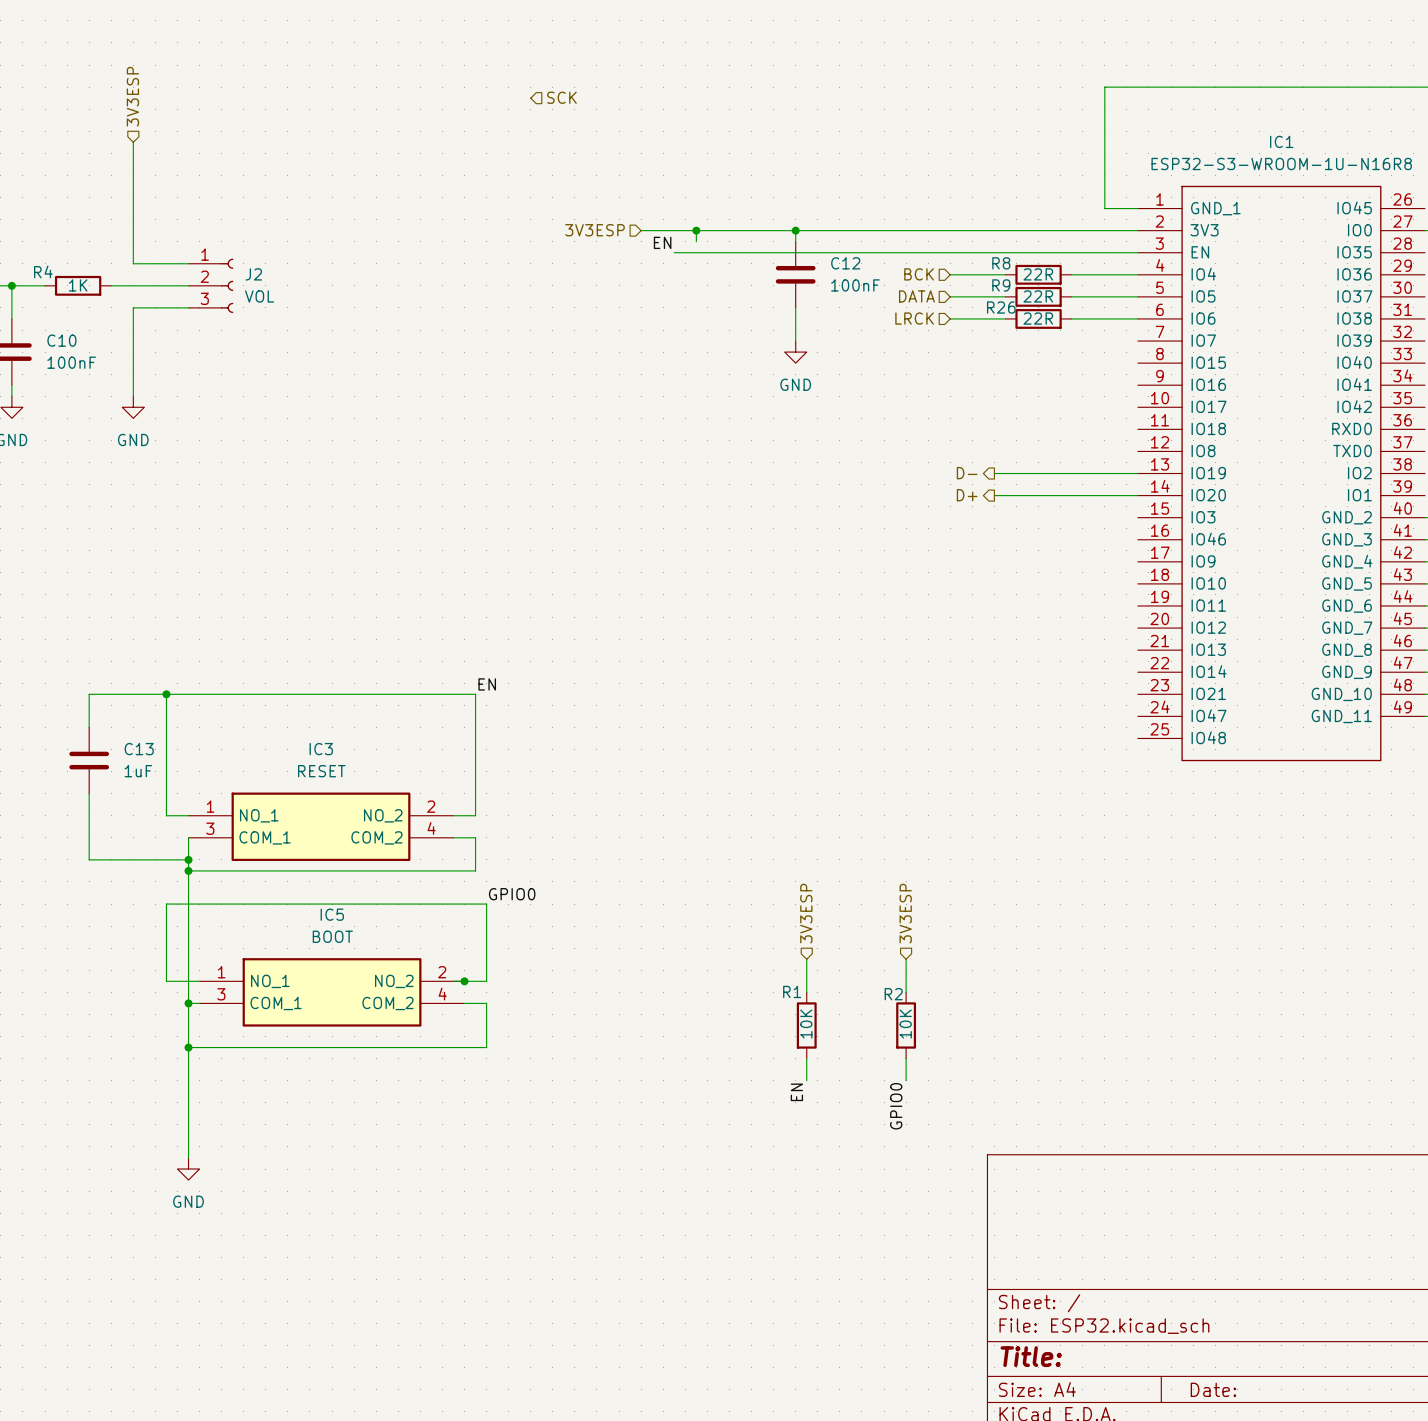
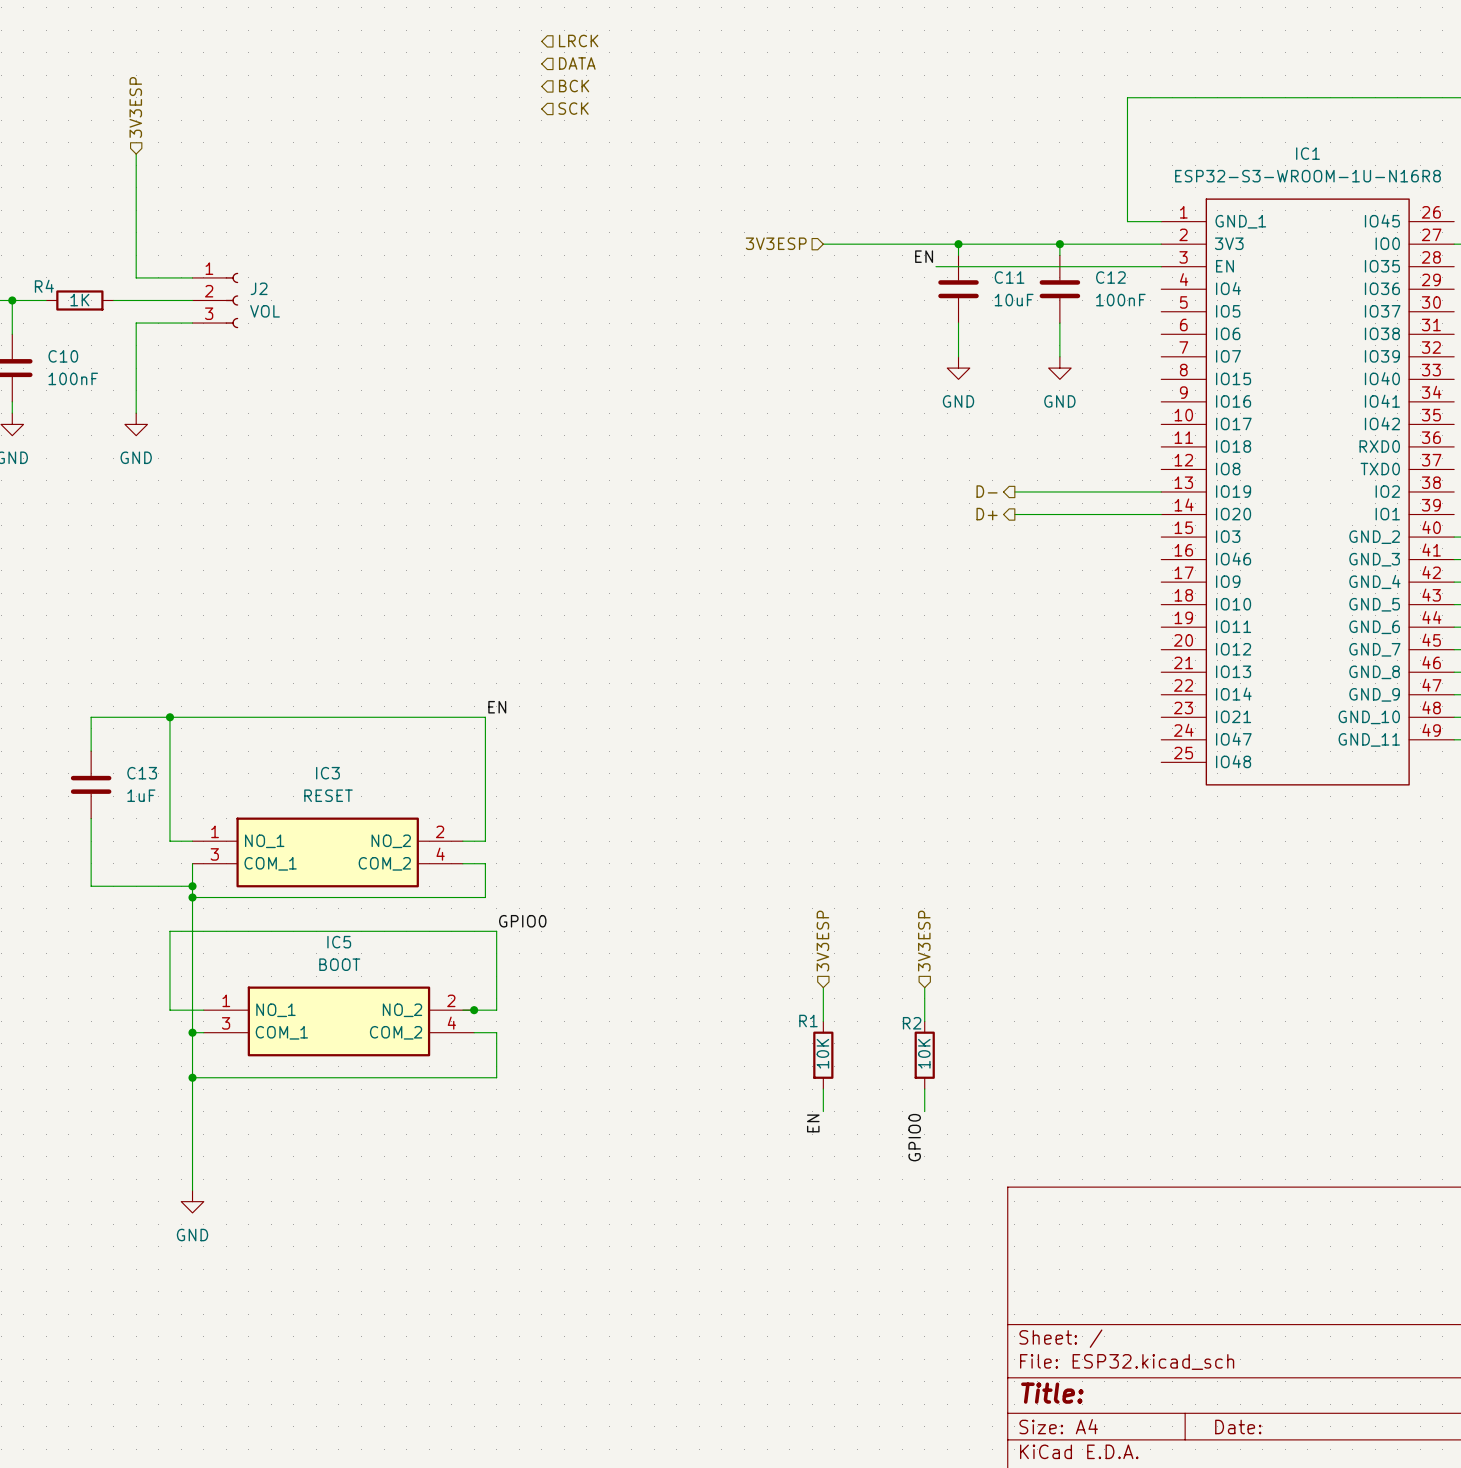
hierarchical label: none -> LRCK (578, 40)
hierarchical label: none -> DATA (577, 63)
hierarchical label: none -> BCK (574, 86)
hierarchical label position: 3V3ESP (594, 230) -> 3V3ESP (776, 243)
wire: (641, 230) (806, 230) -> none
wire: (696, 230) (696, 241) -> none
junction: (696, 230) -> none
junction: (795, 230) -> none
junction: none -> (958, 244)
wire: none -> (1059, 244) (1059, 255)
junction: none -> (1059, 244)
label: EN (662, 242) -> none
label: none -> EN (924, 256)
wire: (674, 252) (917, 252) -> none
C12 position: (795, 274) -> (1059, 289)
hierarchical label: BCK (919, 274) -> none
C11: none -> 10uF (958, 289)
wire: (950, 274) (1005, 274) -> none
R8: 22R (1038, 274) -> none
wire: (1071, 274) (1137, 274) -> none
hierarchical label: DATA (916, 296) -> none
wire: (950, 296) (1005, 296) -> none
R9: 22R (1038, 296) -> none
wire: (1071, 296) (1137, 296) -> none
wire: (795, 307) (795, 341) -> (958, 323) (958, 356)
wire: none -> (1059, 323) (1059, 356)
hierarchical label: LRCK (914, 318) -> none
wire: (950, 318) (1005, 318) -> none
R26: 22R (1038, 318) -> none
wire: (1071, 318) (1137, 318) -> none
power symbol: GND (795, 352) -> none
power symbol: none -> GND (958, 368)
power symbol: none -> GND (1059, 368)

